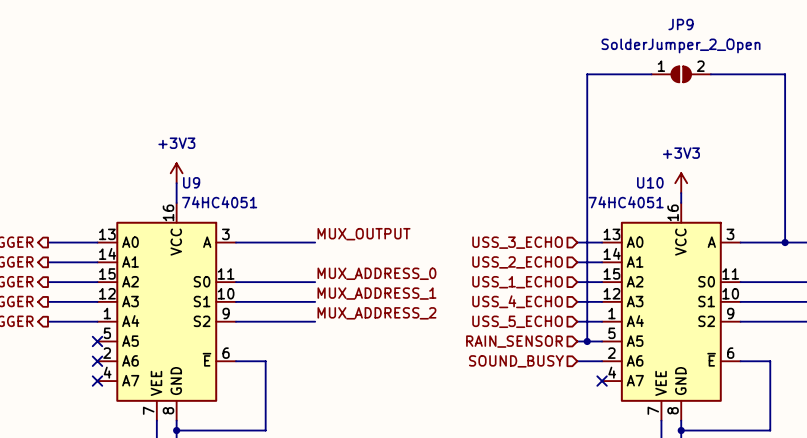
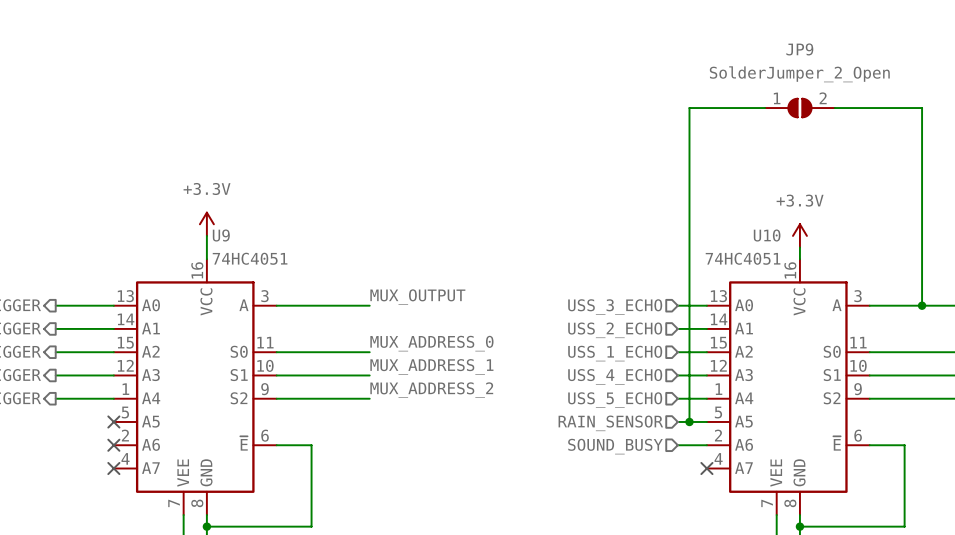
power symbol: +3V3 (176, 173) -> +3.3V (206, 224)
power symbol: +3V3 (681, 183) -> +3.3V (799, 235)

